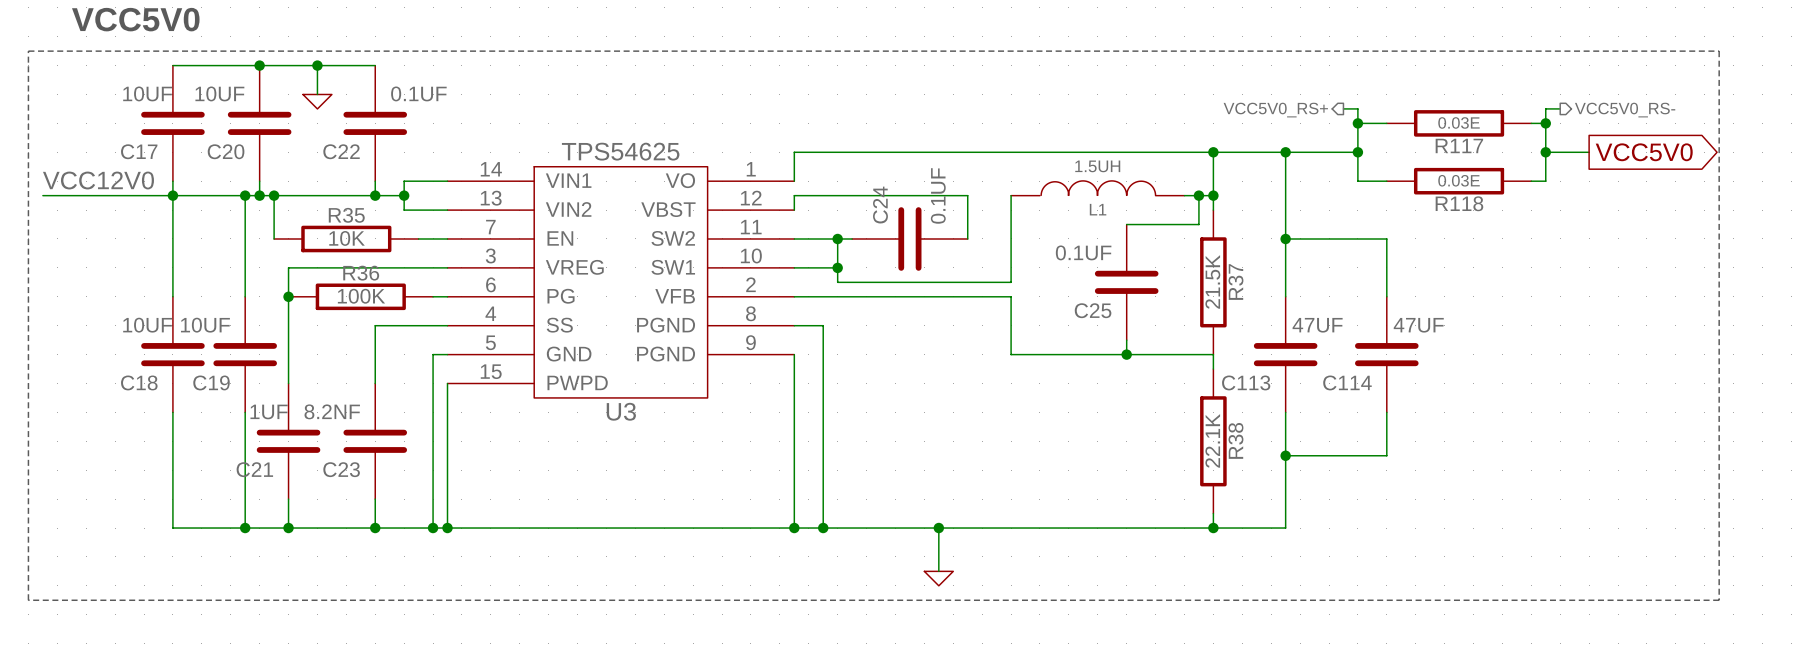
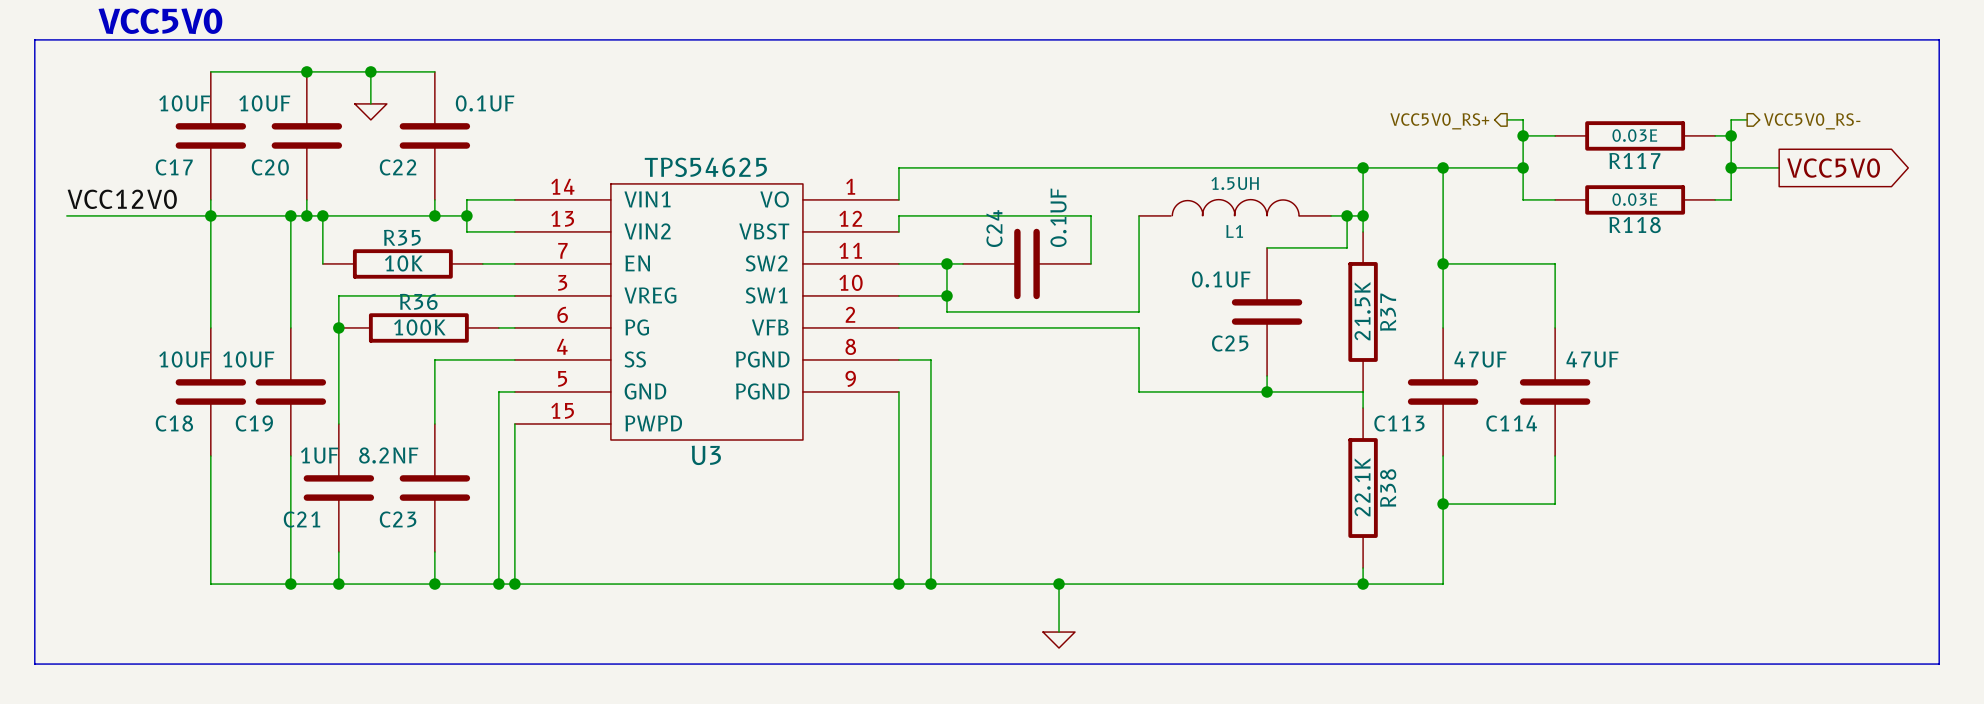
bus: none -> (34, 39) (1939, 39) (1939, 664) (34, 664) (34, 39)
line: (28, 51) (1719, 51) (1719, 600) (28, 600) (28, 51) -> none

